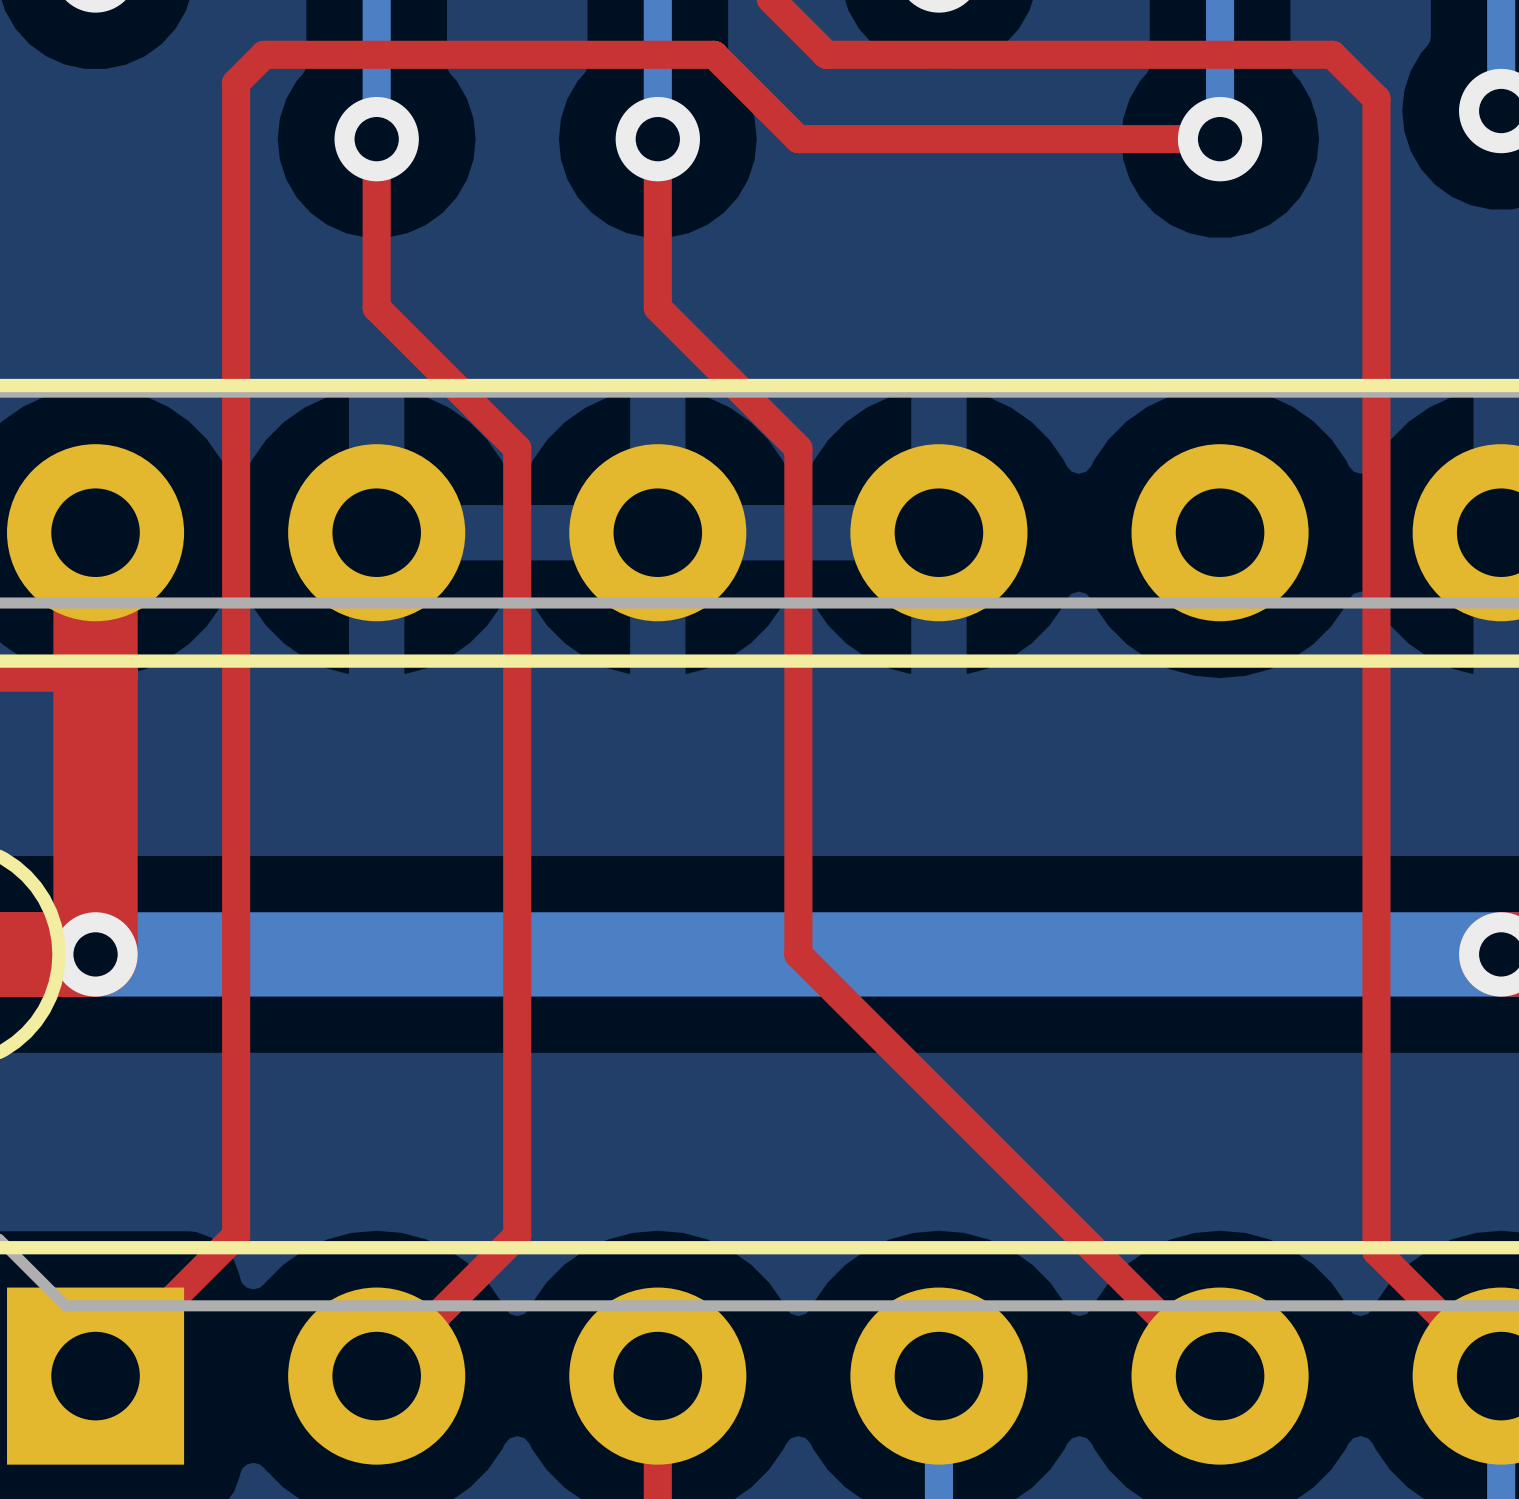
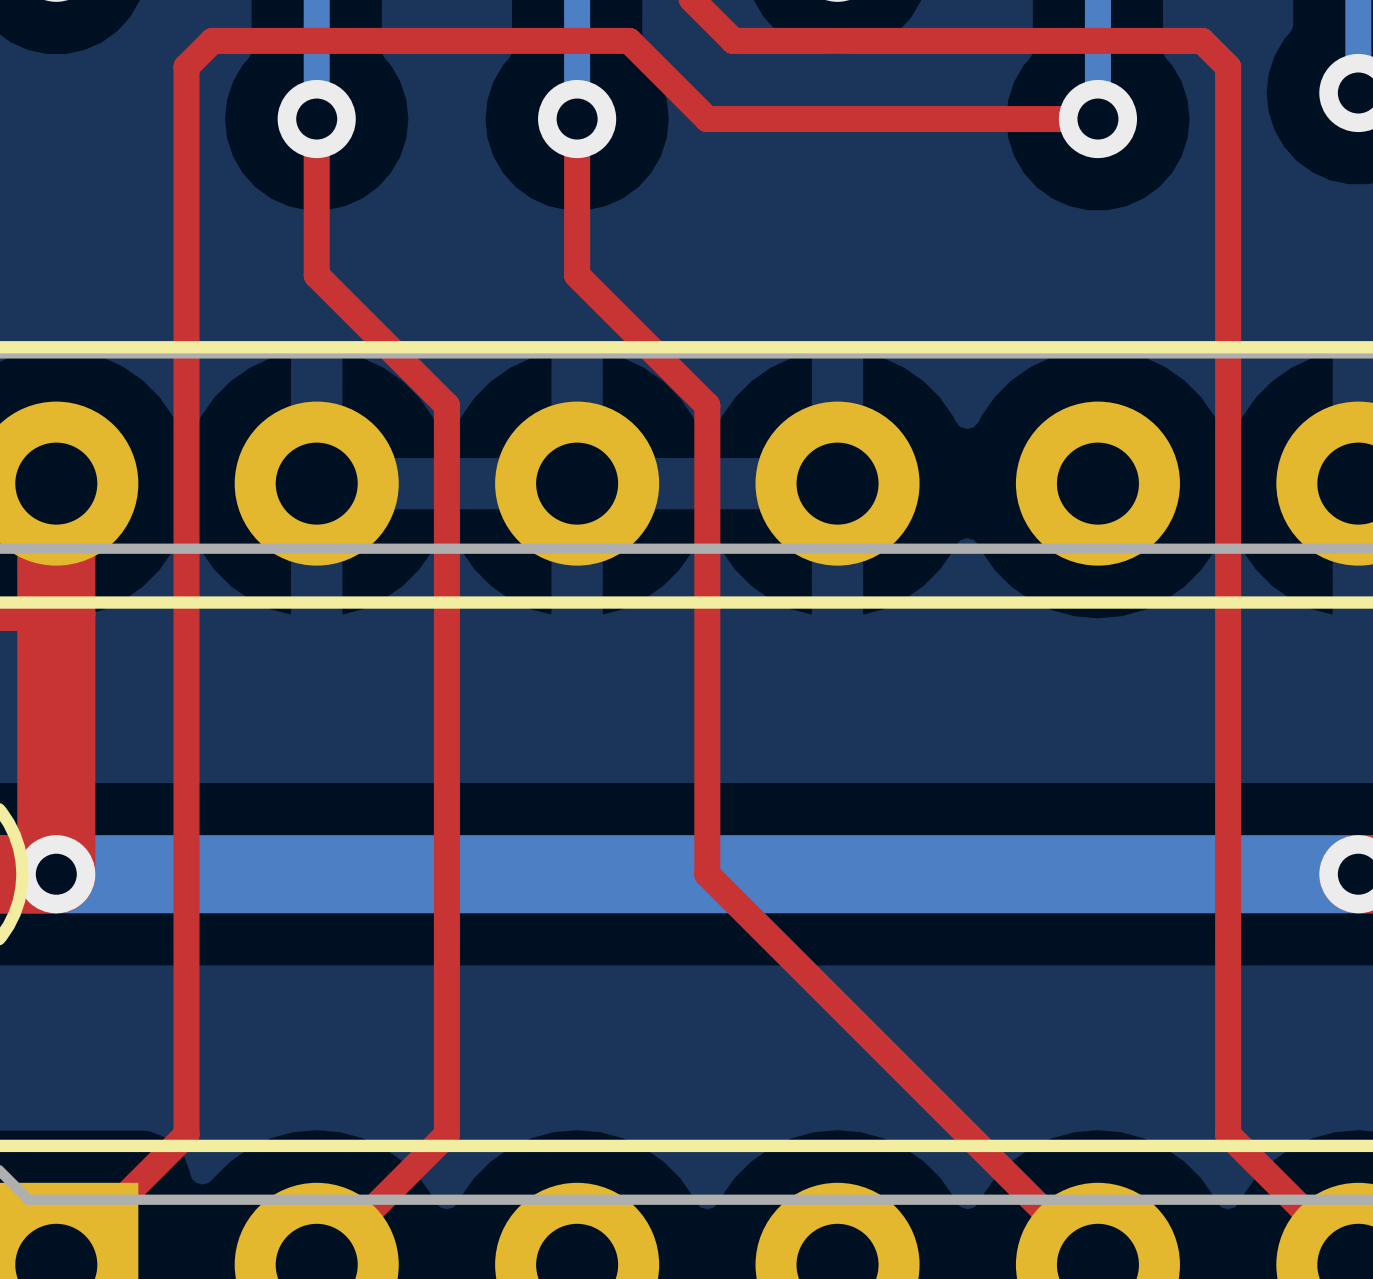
top track: (1360, 82) (1376, 98) (1376, 1251) -> (1228, 66) (1228, 1134) (1242, 1149)

